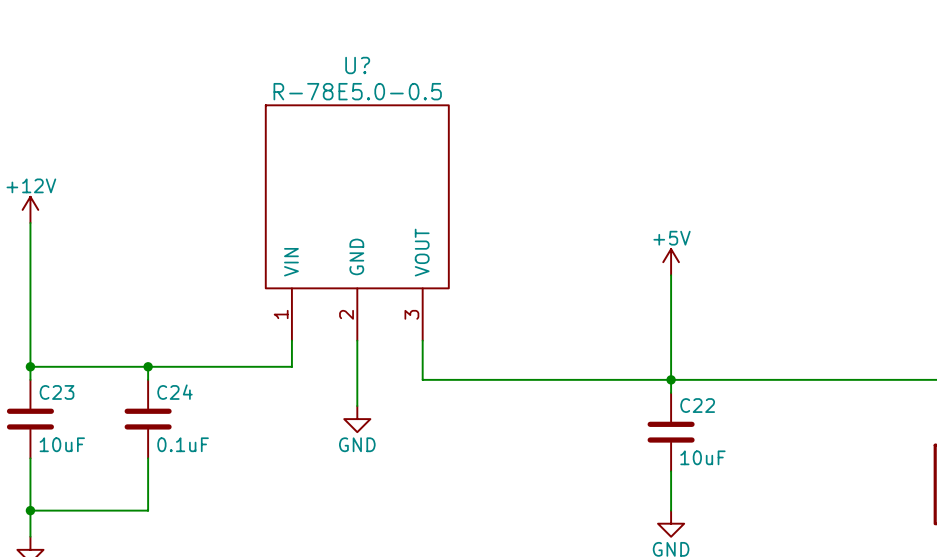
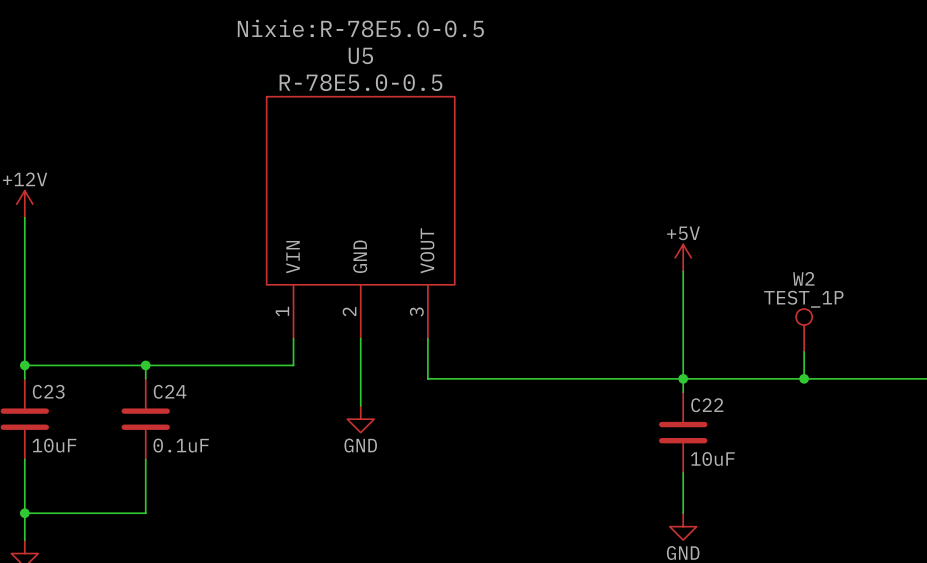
U? text: none -> Nixie:R-78E5.0-0.5 (360, 28)
U? name: U? (357, 65) -> U5 (360, 55)
W2: none -> TEST_1P (804, 330)
wire: none -> (804, 351) (804, 378)
junction: none -> (804, 378)

